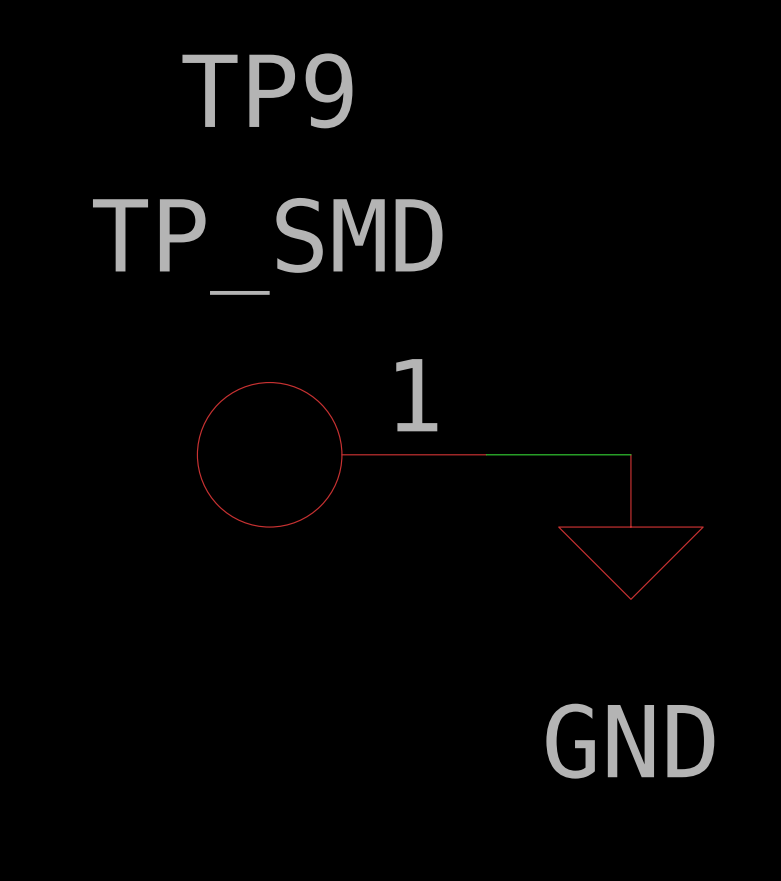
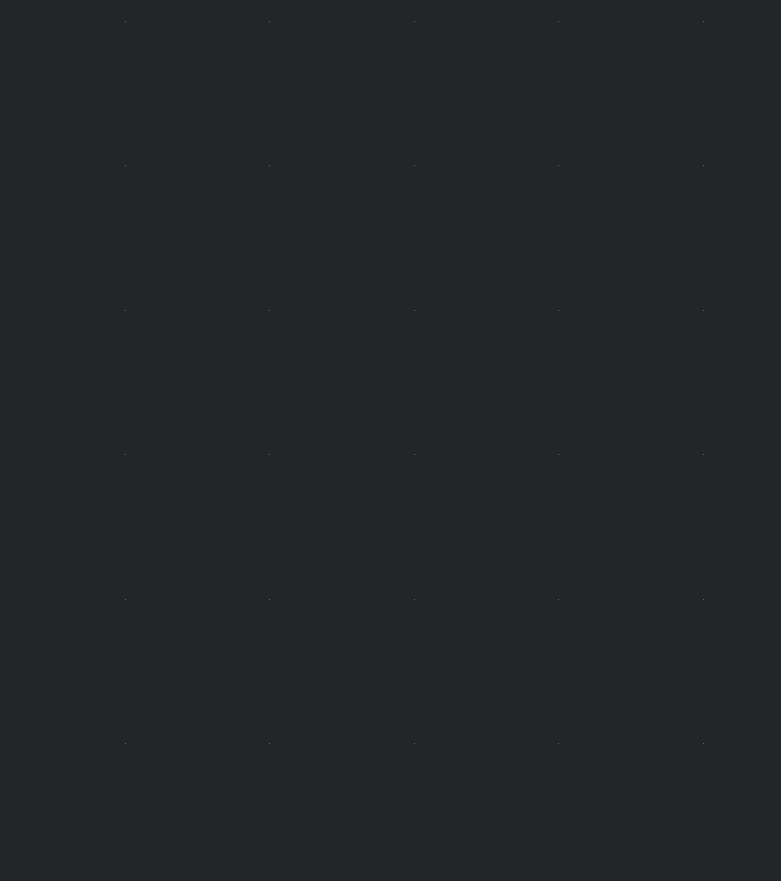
TP9: TP_SMD (341, 454) -> none
wire: (486, 454) (630, 454) -> none
power symbol: GND (630, 527) -> none

